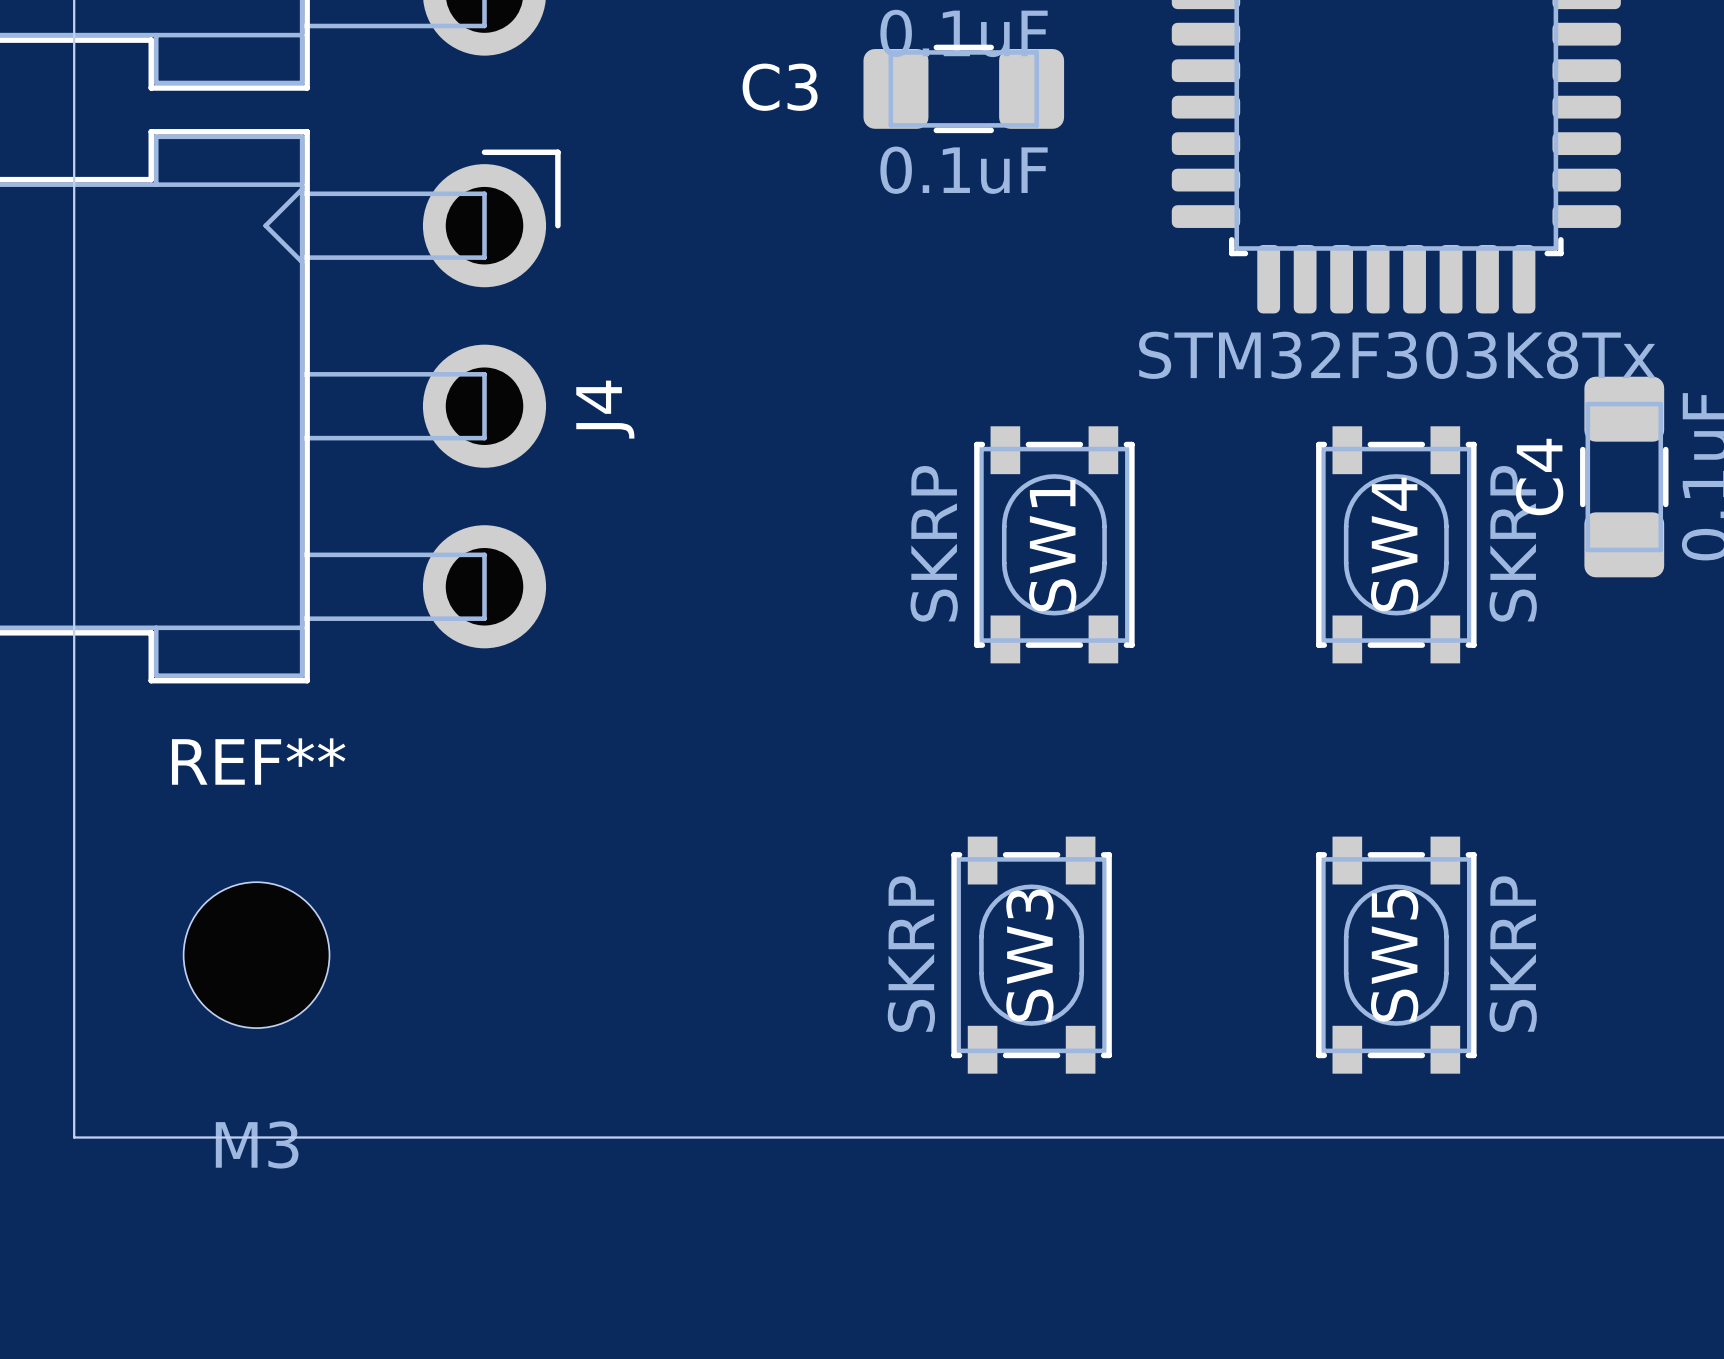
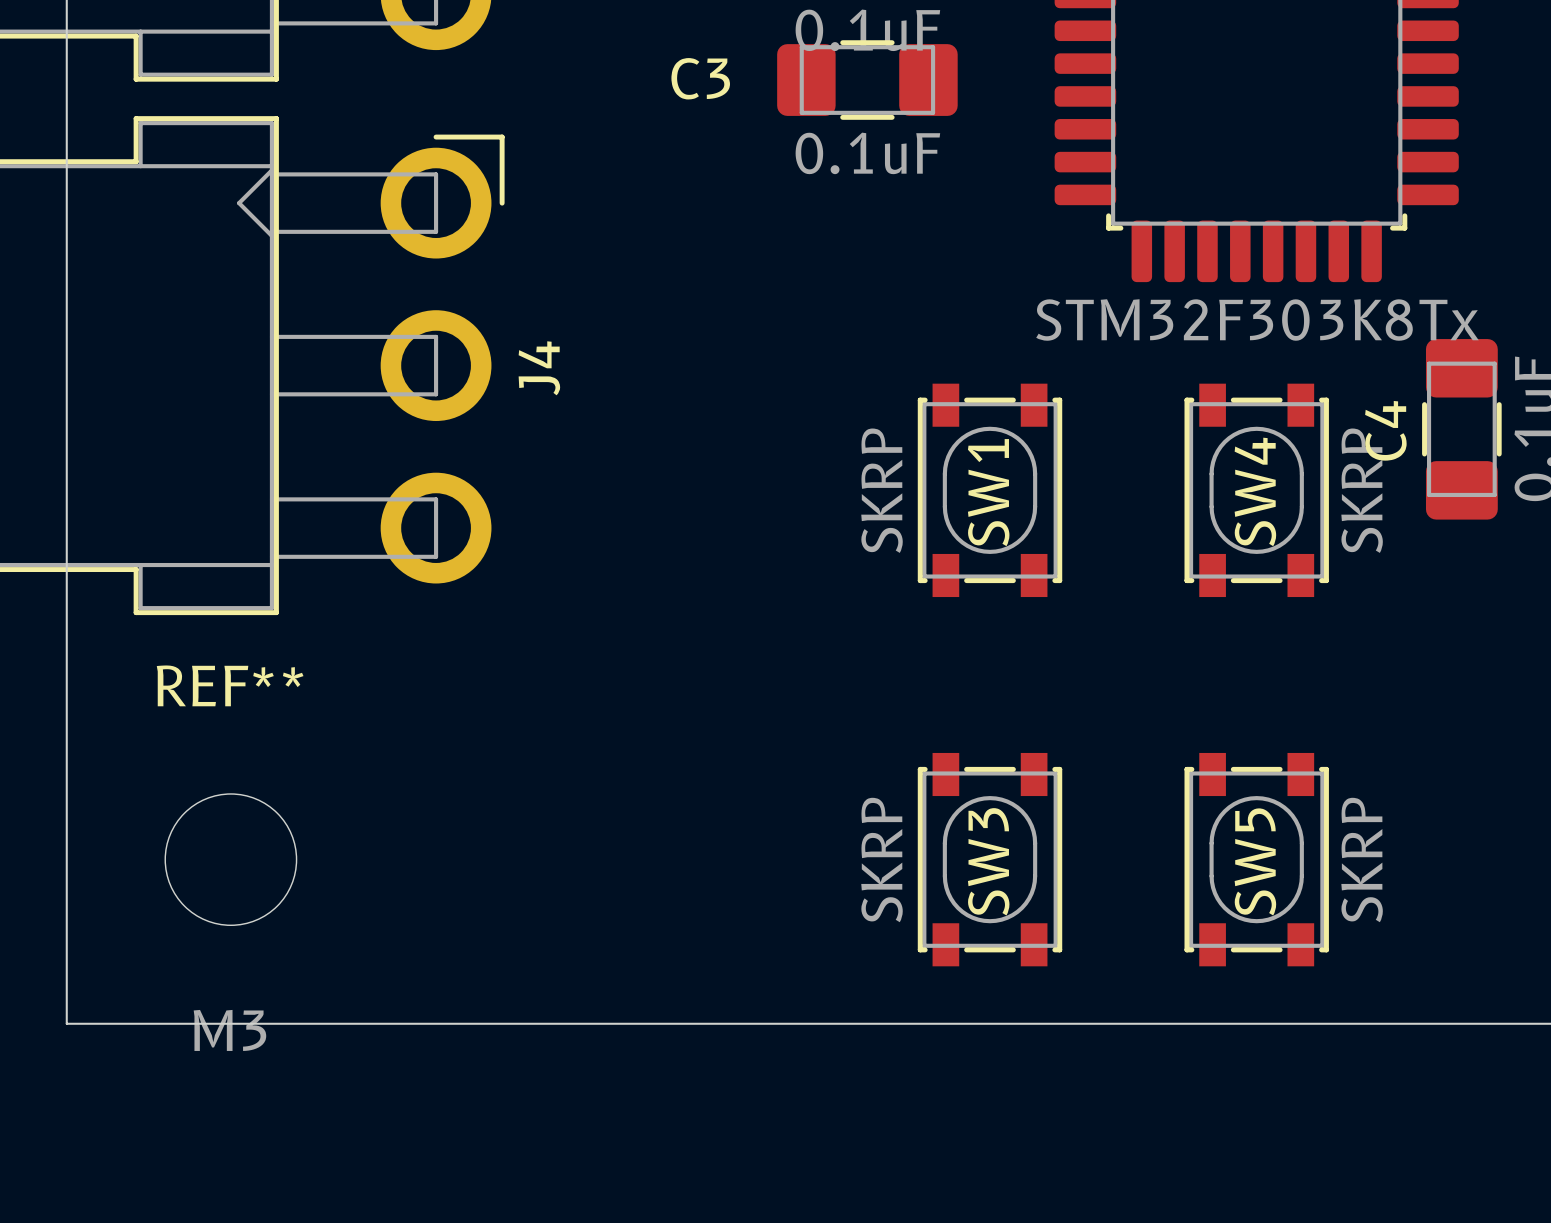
SW1 position: (1054, 544) -> (990, 490)
SW3 position: (1031, 955) -> (990, 859)

